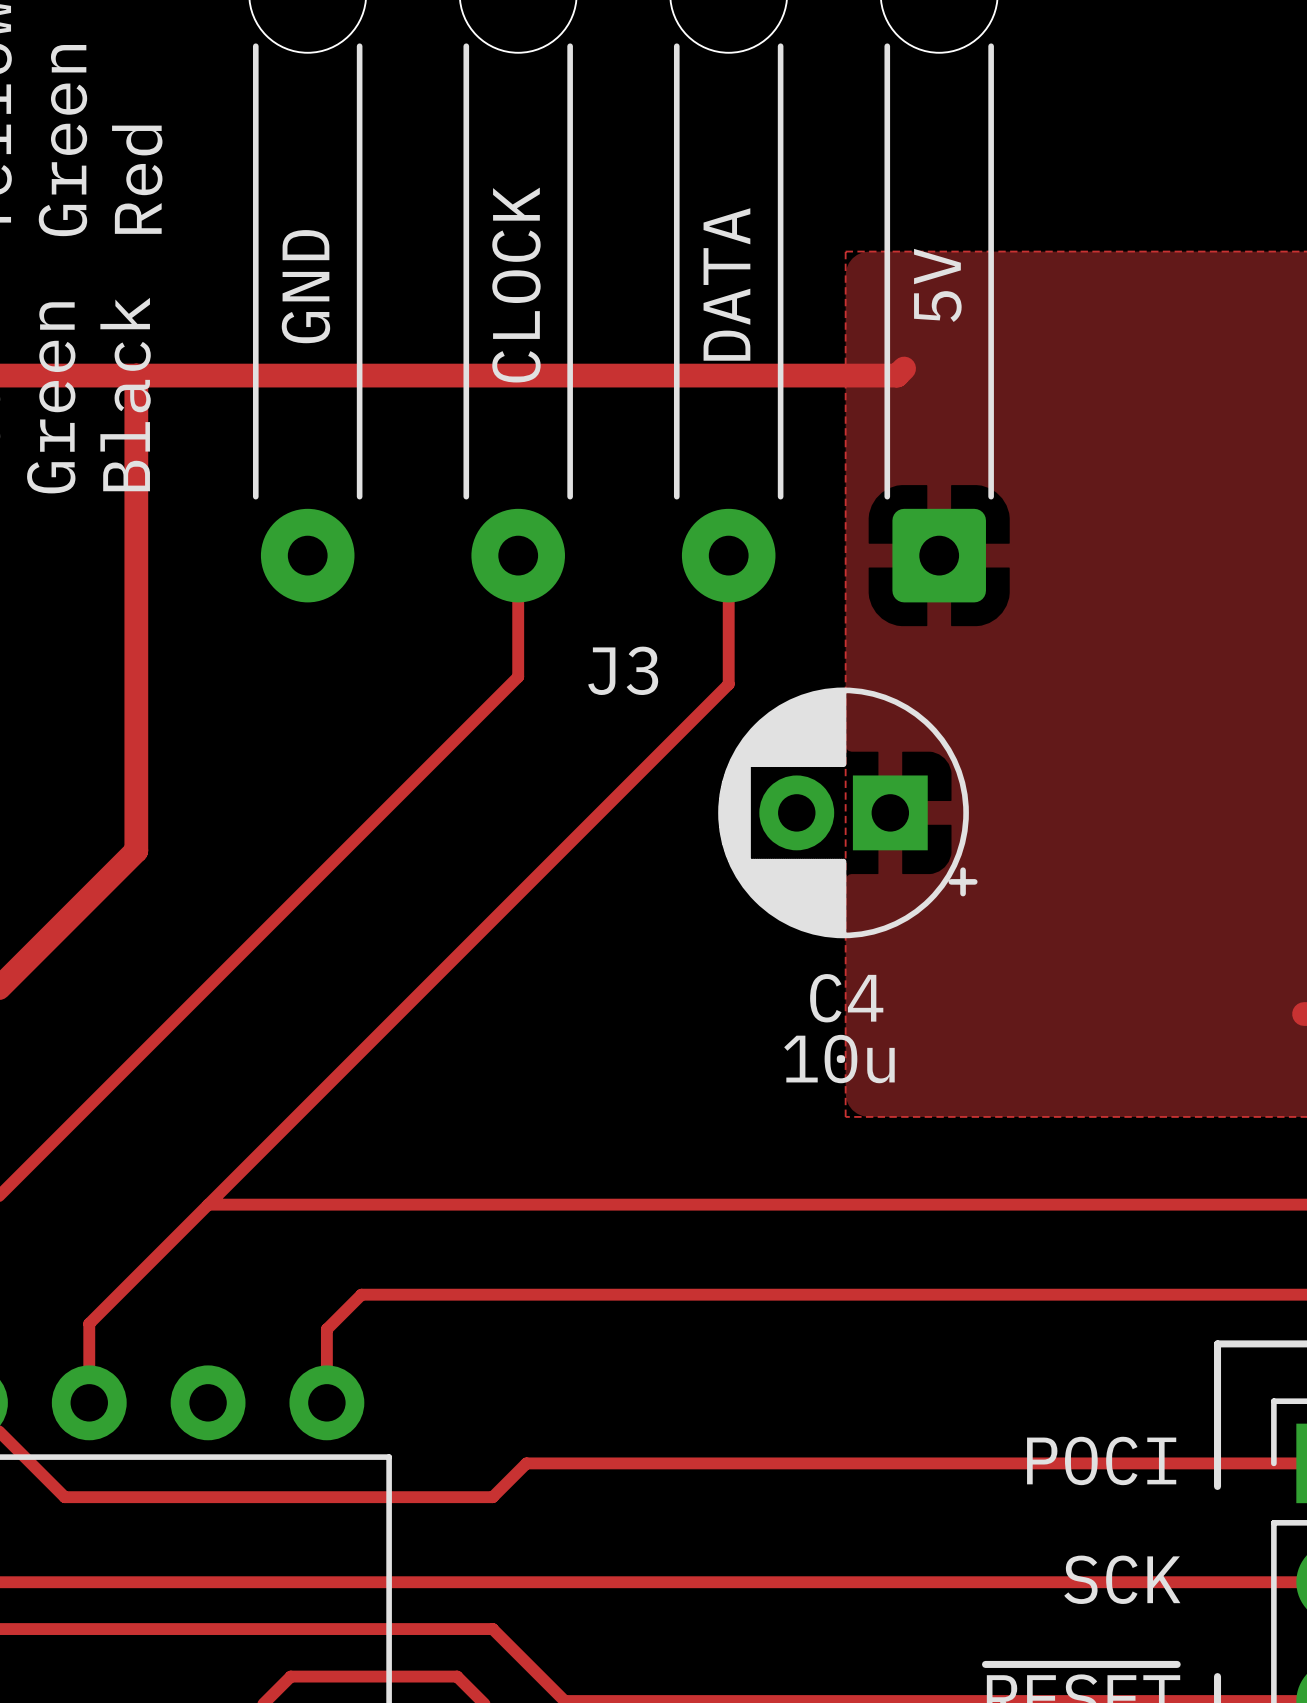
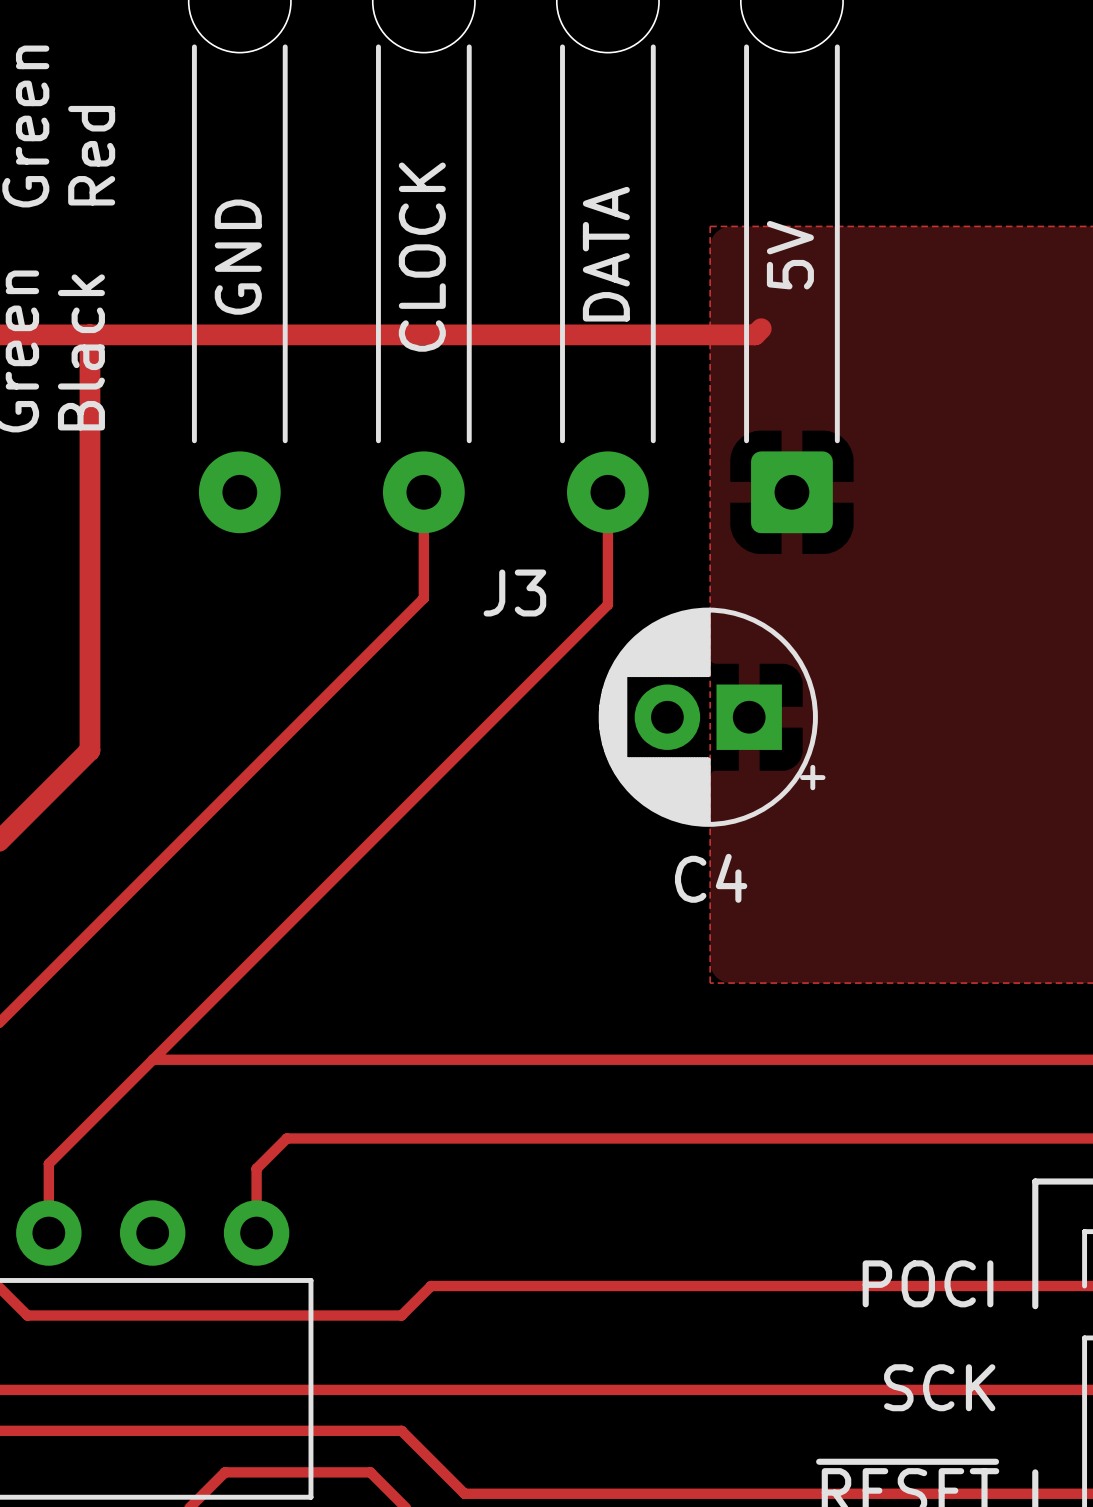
C4 value: 10u (839, 1059) -> none

